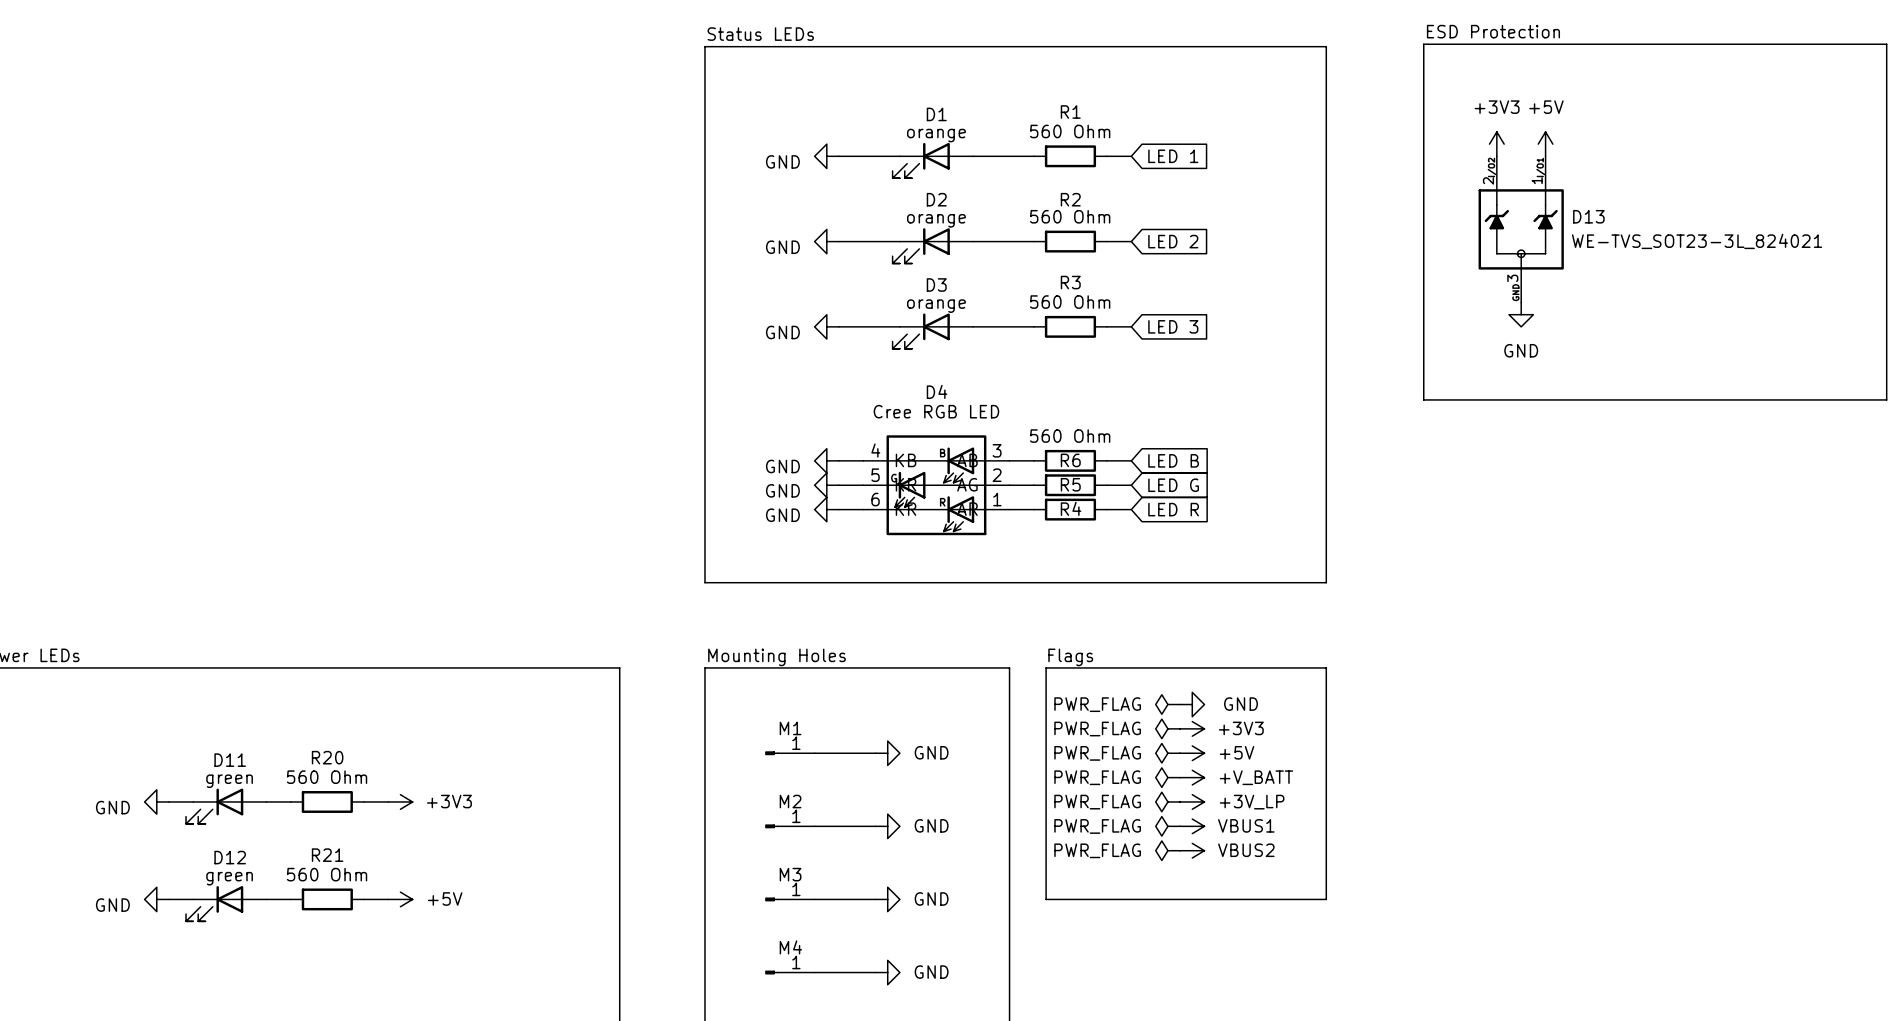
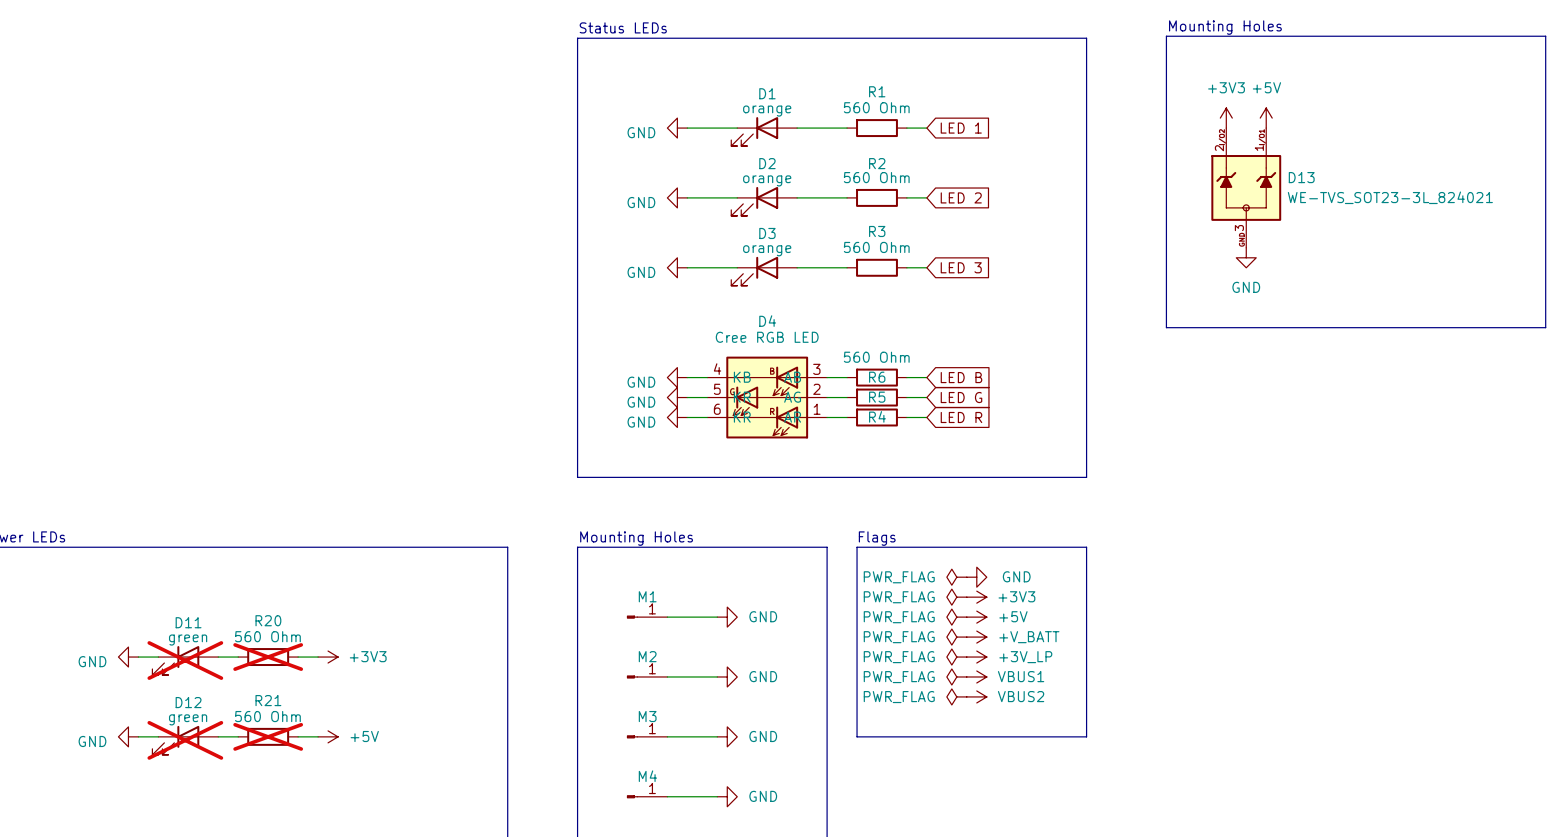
text: ESD Protection (1493, 31) -> Mounting Holes (1225, 27)
R20 do-not-place cross: none -> (268, 657)
D11 do-not-place cross: none -> (185, 660)
R21 do-not-place cross: none -> (268, 736)
D12 do-not-place cross: none -> (185, 740)

